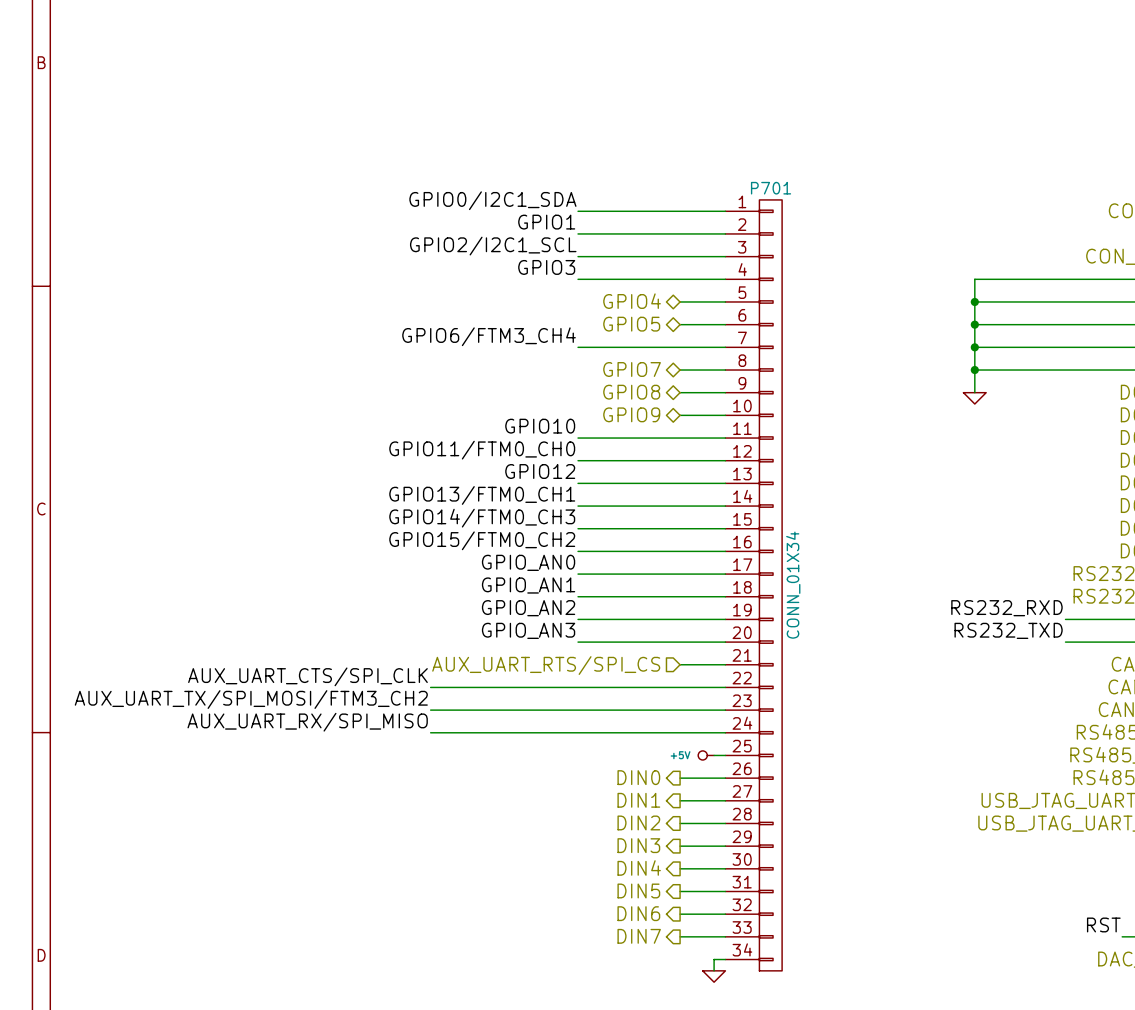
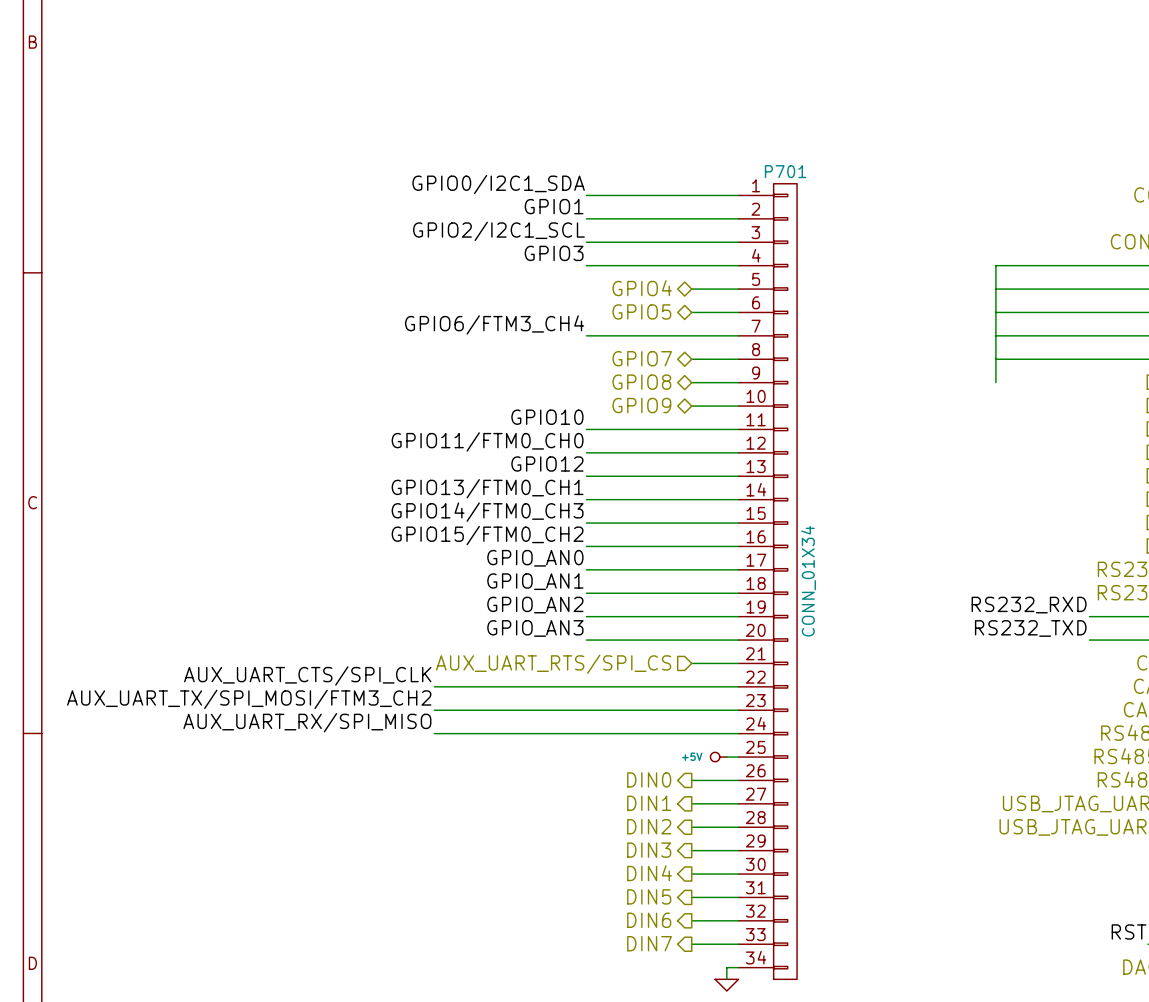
junction: (974, 301) -> none
junction: (974, 324) -> none
junction: (974, 347) -> none
junction: (974, 370) -> none
power symbol: (974, 398) -> none

